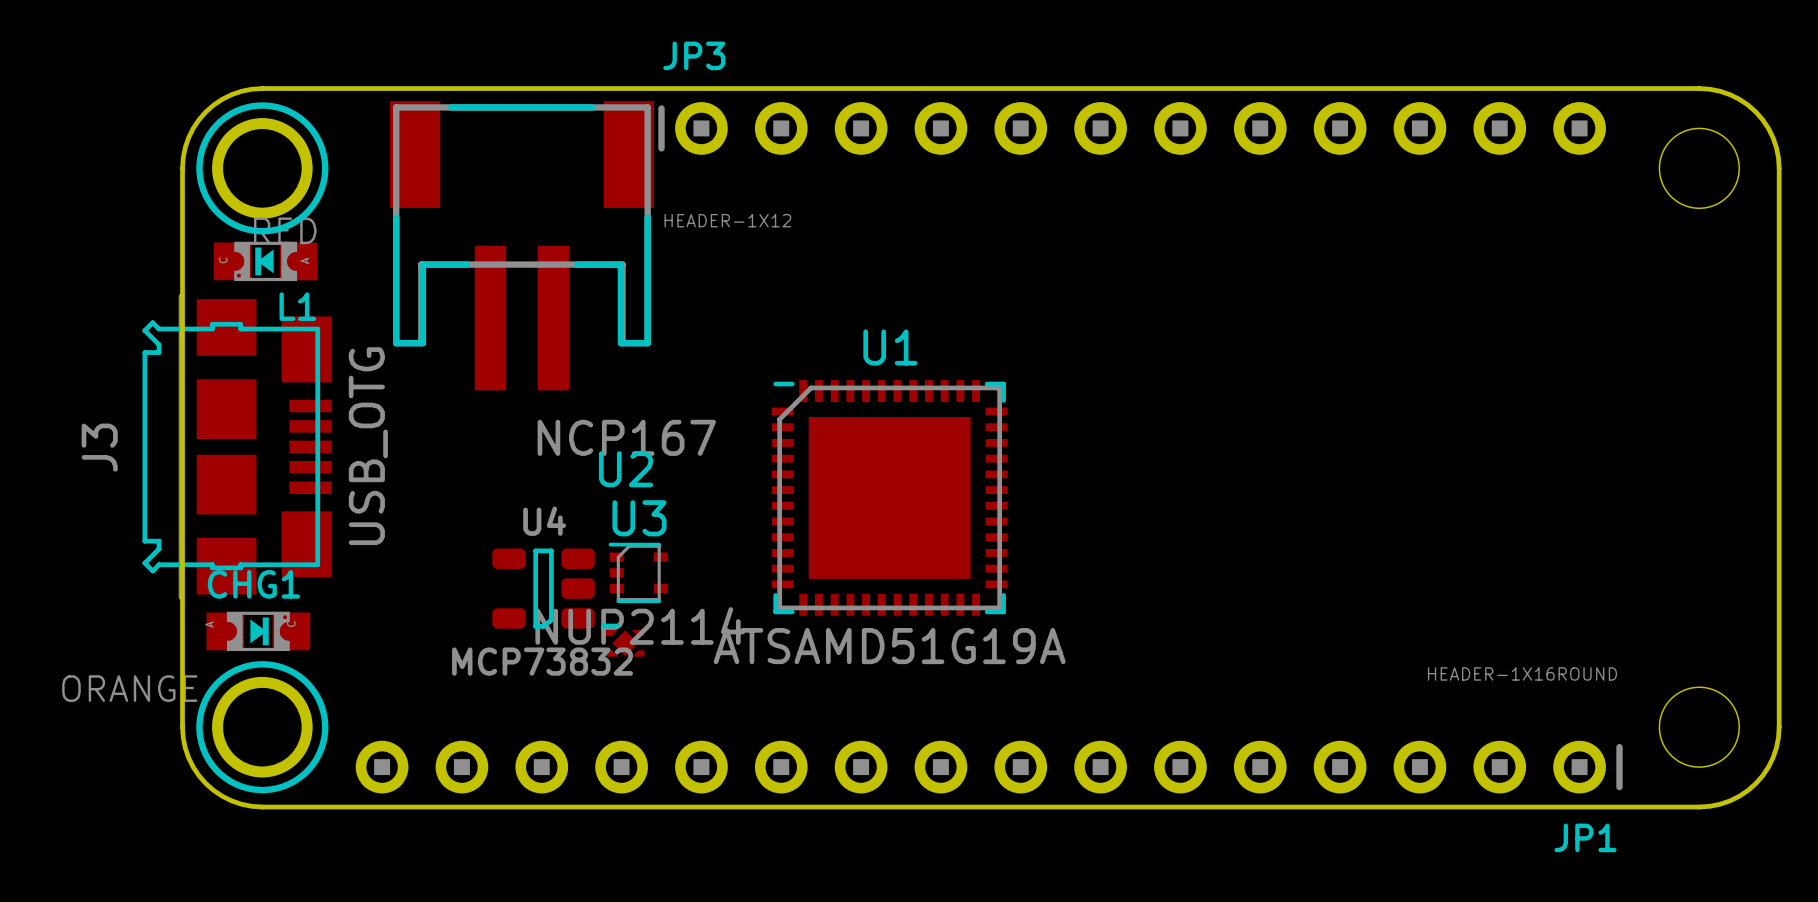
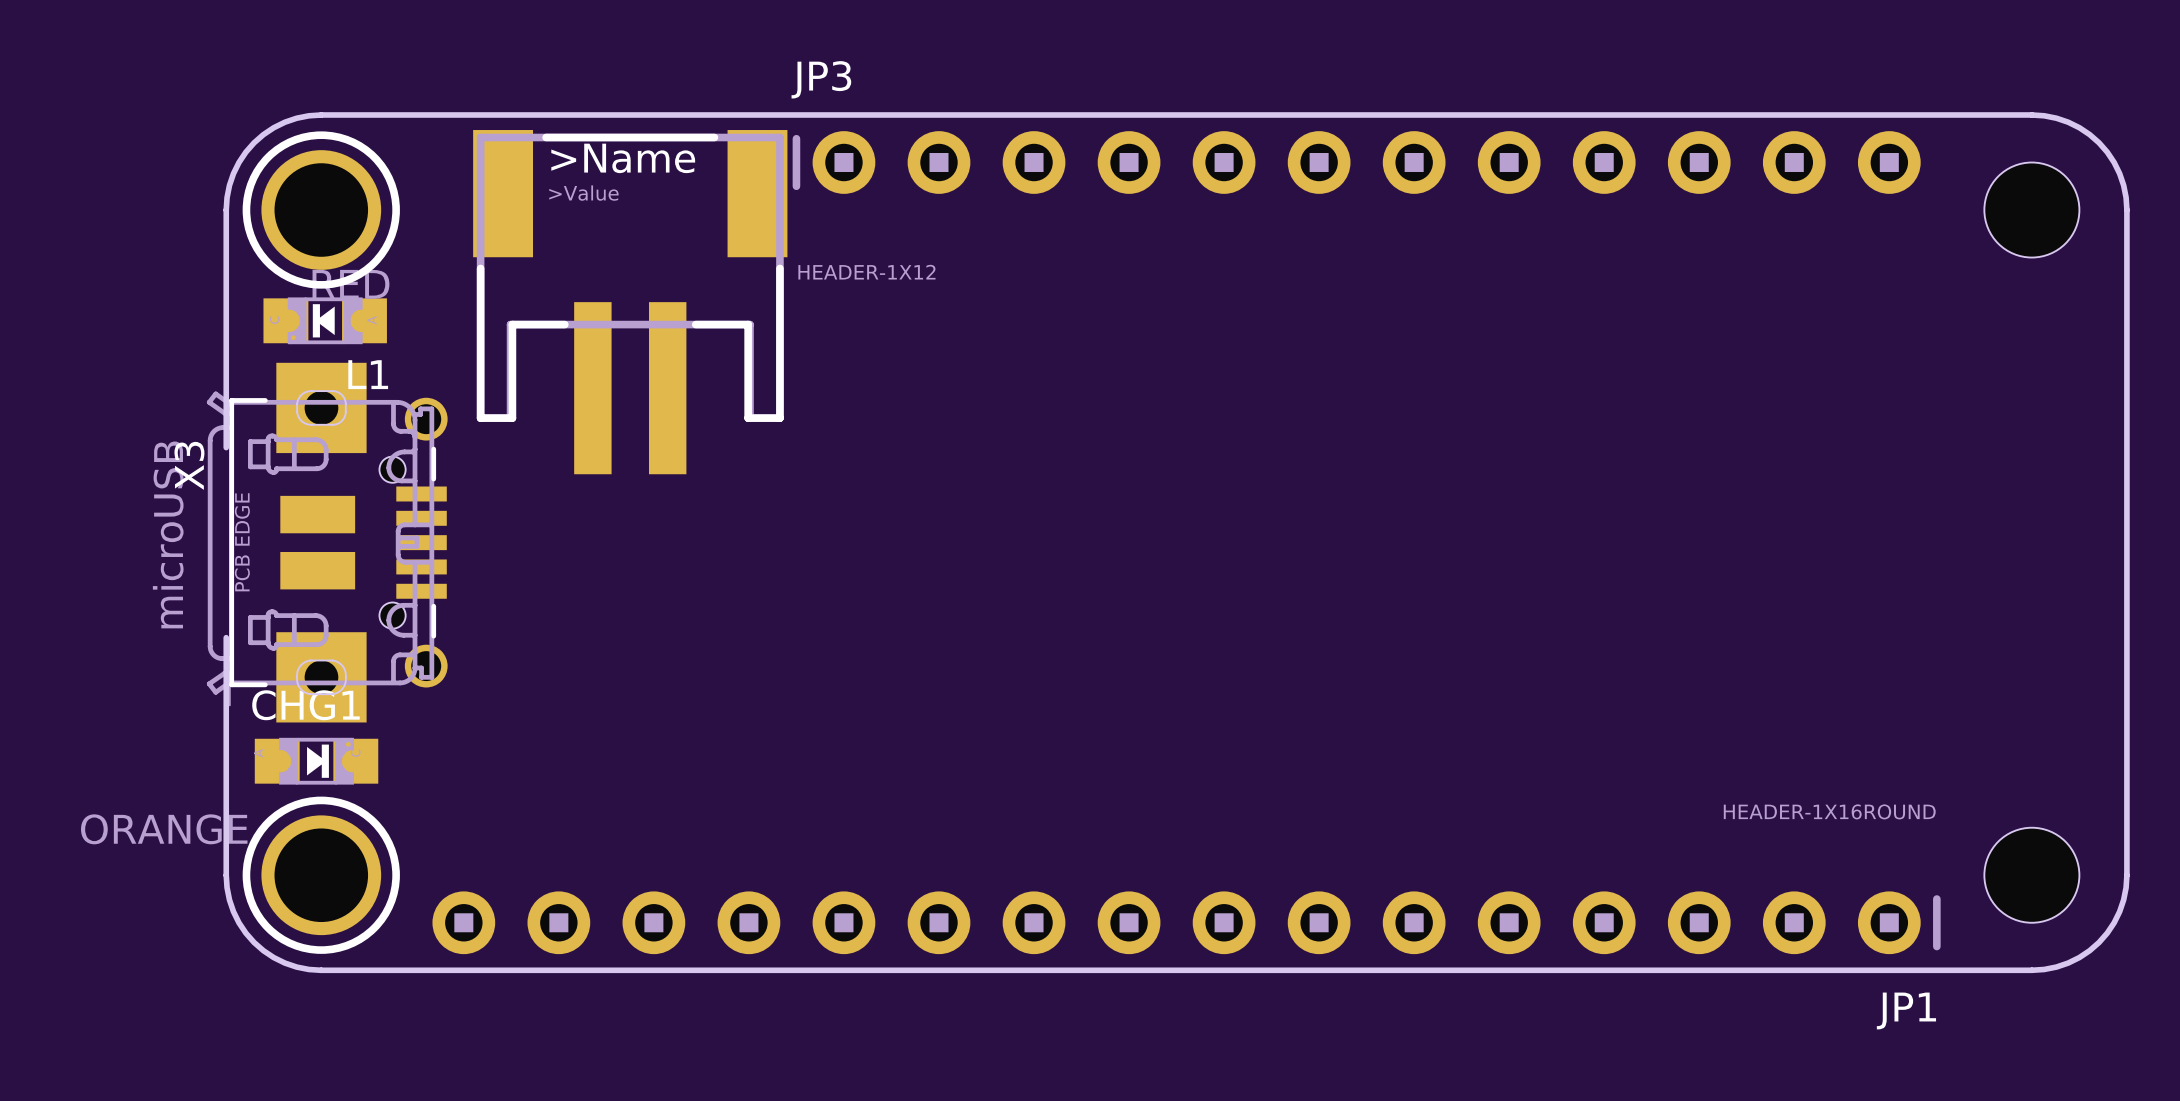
part text: none -> >Name (623, 158)
part text: none -> >Value (583, 193)
board edge: (182, 367) (182, 527) -> none
J3: USB_OTG (237, 446) -> none
X3: none -> microUSB (327, 542)
U1: ATSAMD51G19A (889, 497) -> none
U3: NUP2114 (638, 572) -> none
U4: MCP73832 (543, 588) -> none
U2: NCP167 (622, 640) -> none

